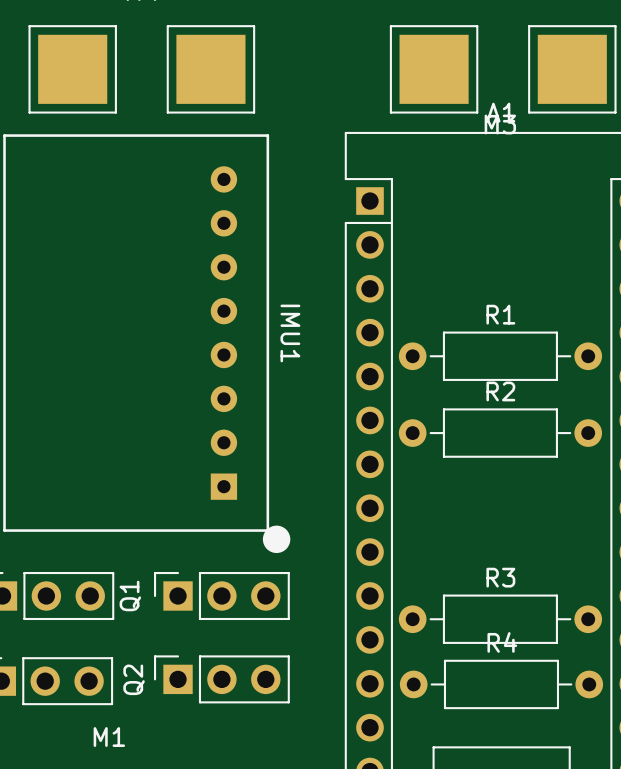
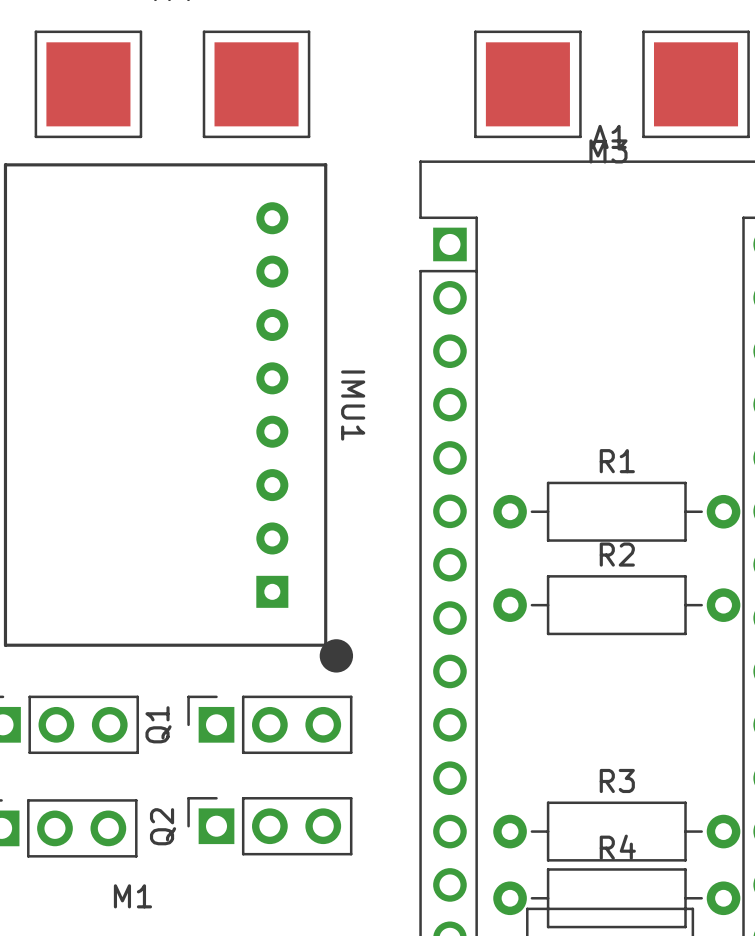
R1 position: (500, 356) -> (616, 511)
R2 position: (500, 433) -> (616, 605)
R3 position: (500, 619) -> (616, 831)
R4 position: (501, 684) -> (616, 898)

